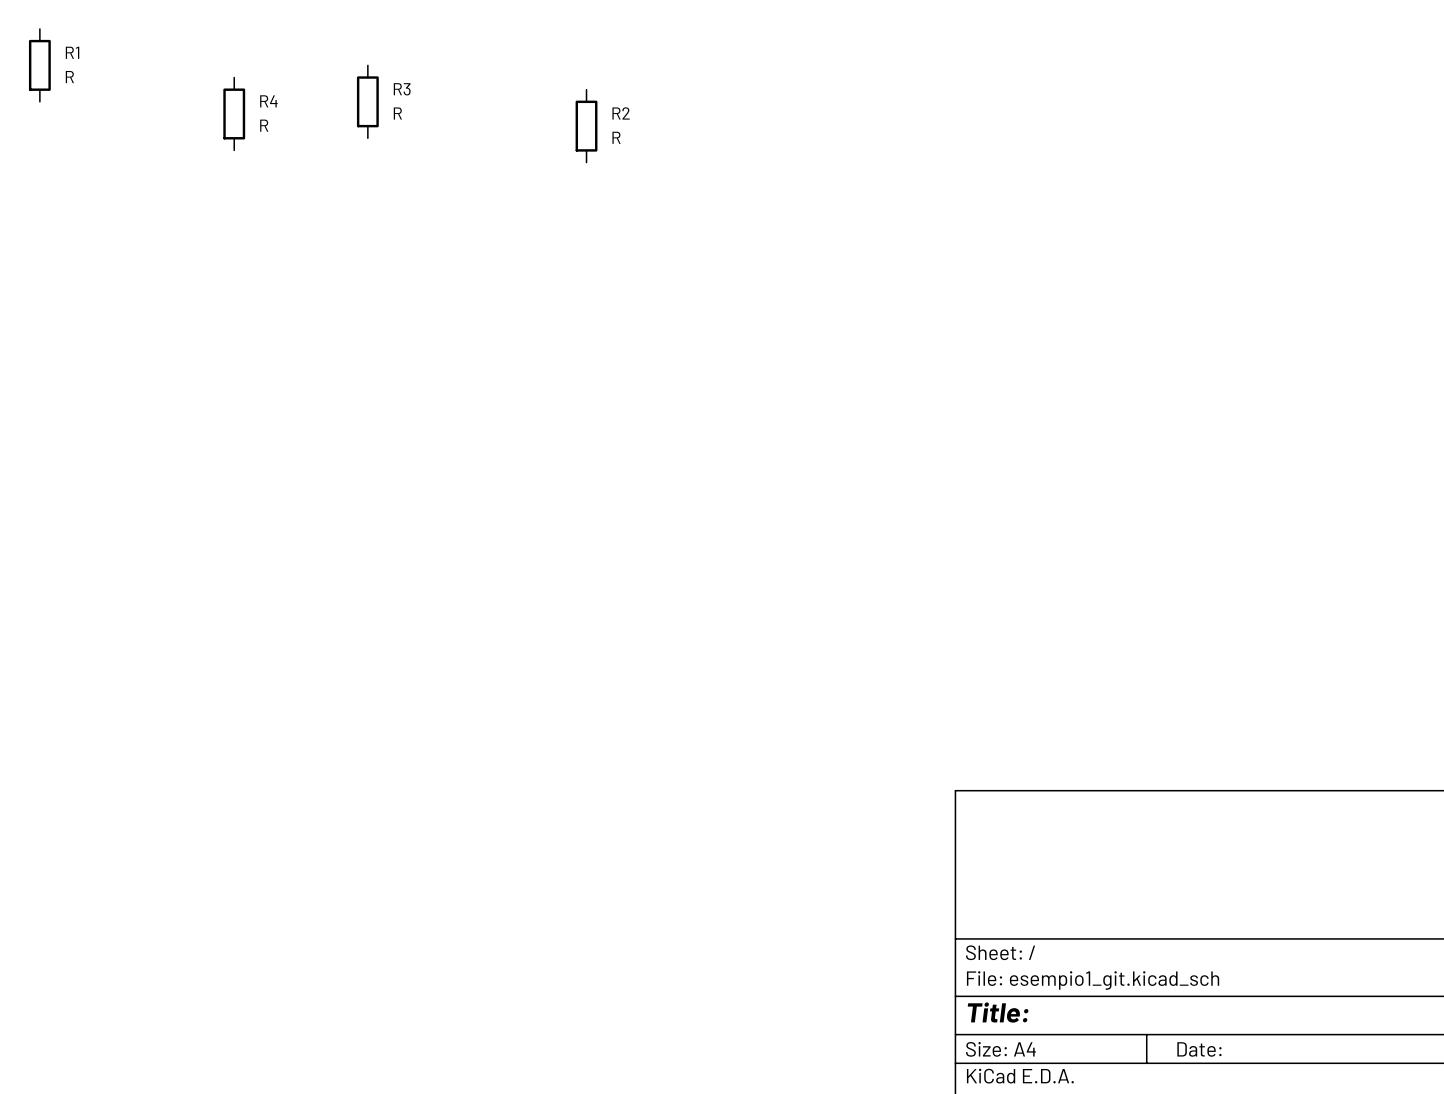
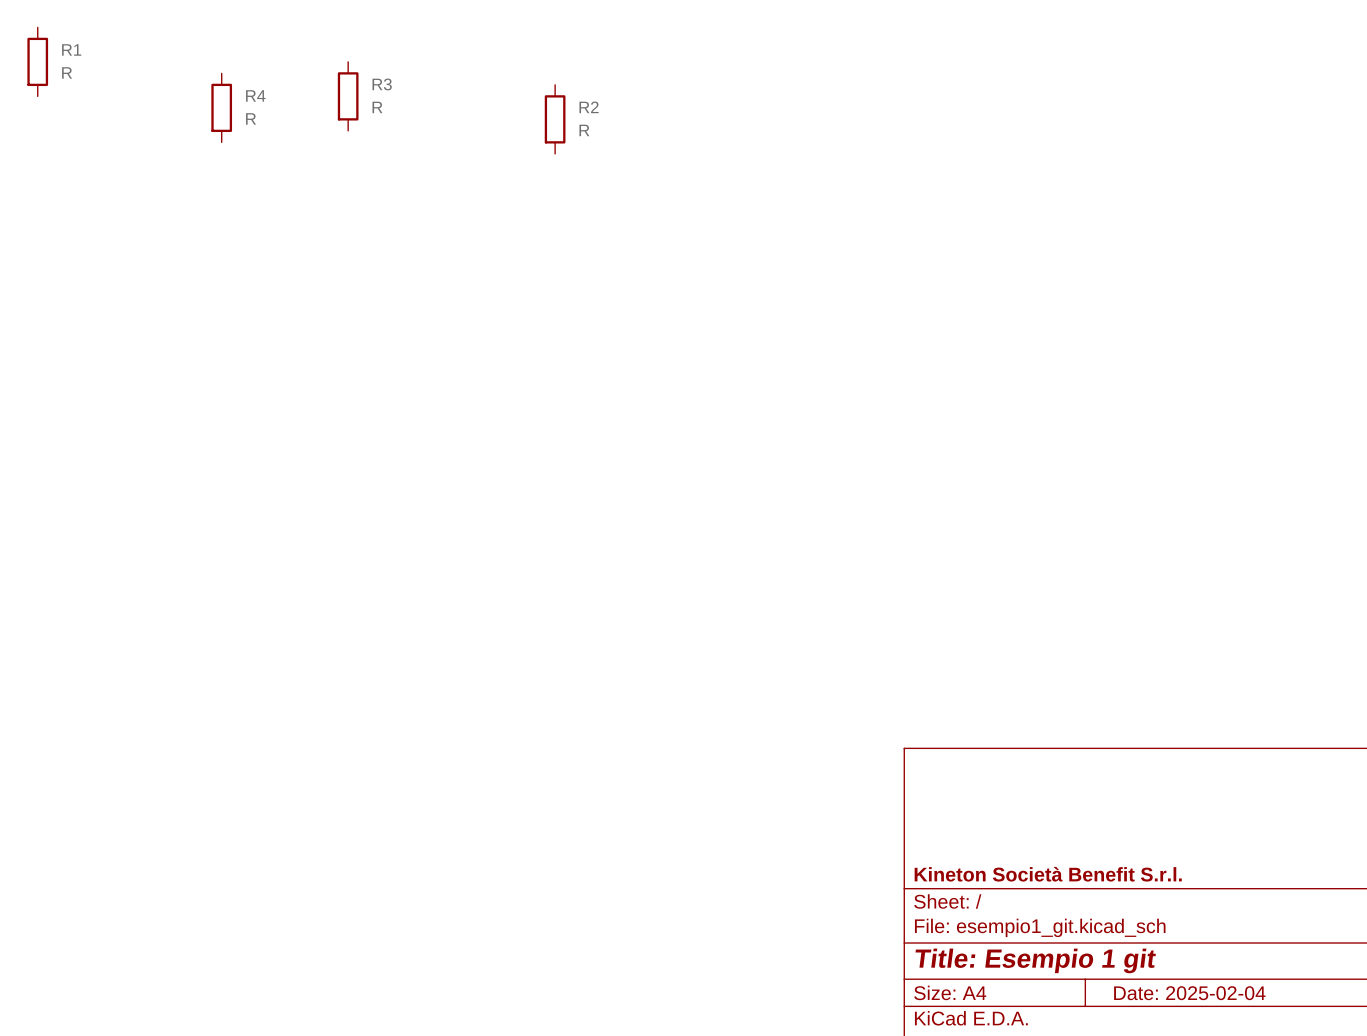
title block: none -> Kineton Società Benefit S.r.l. (1048, 874)
title block: Title: (998, 1012) -> Title: Esempio 1 git (1035, 960)
title block: Date: (1199, 1049) -> Date: 2025-02-04 (1189, 993)

